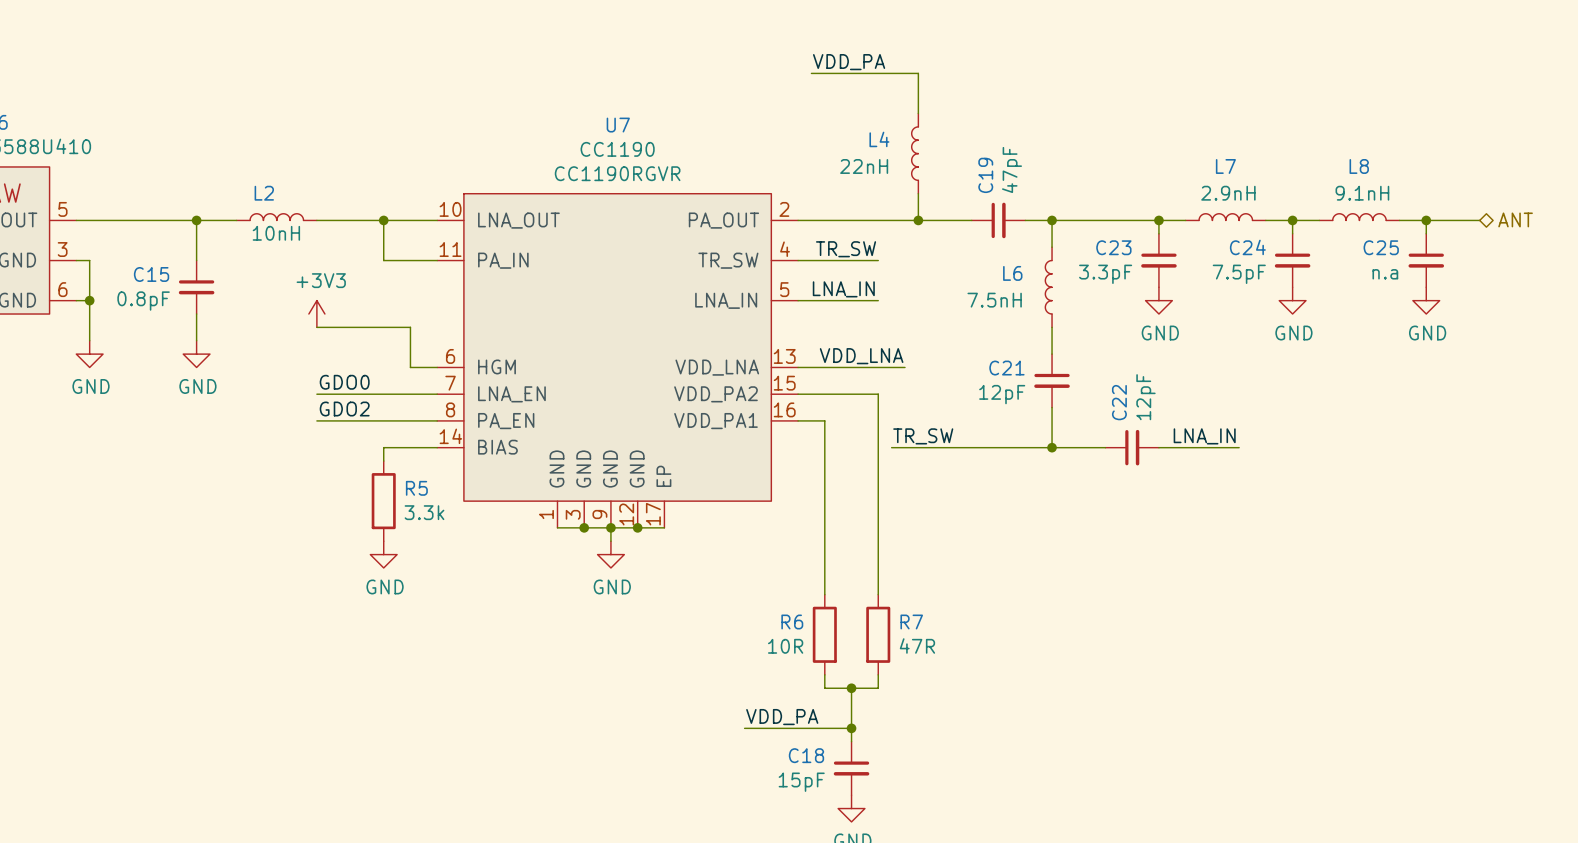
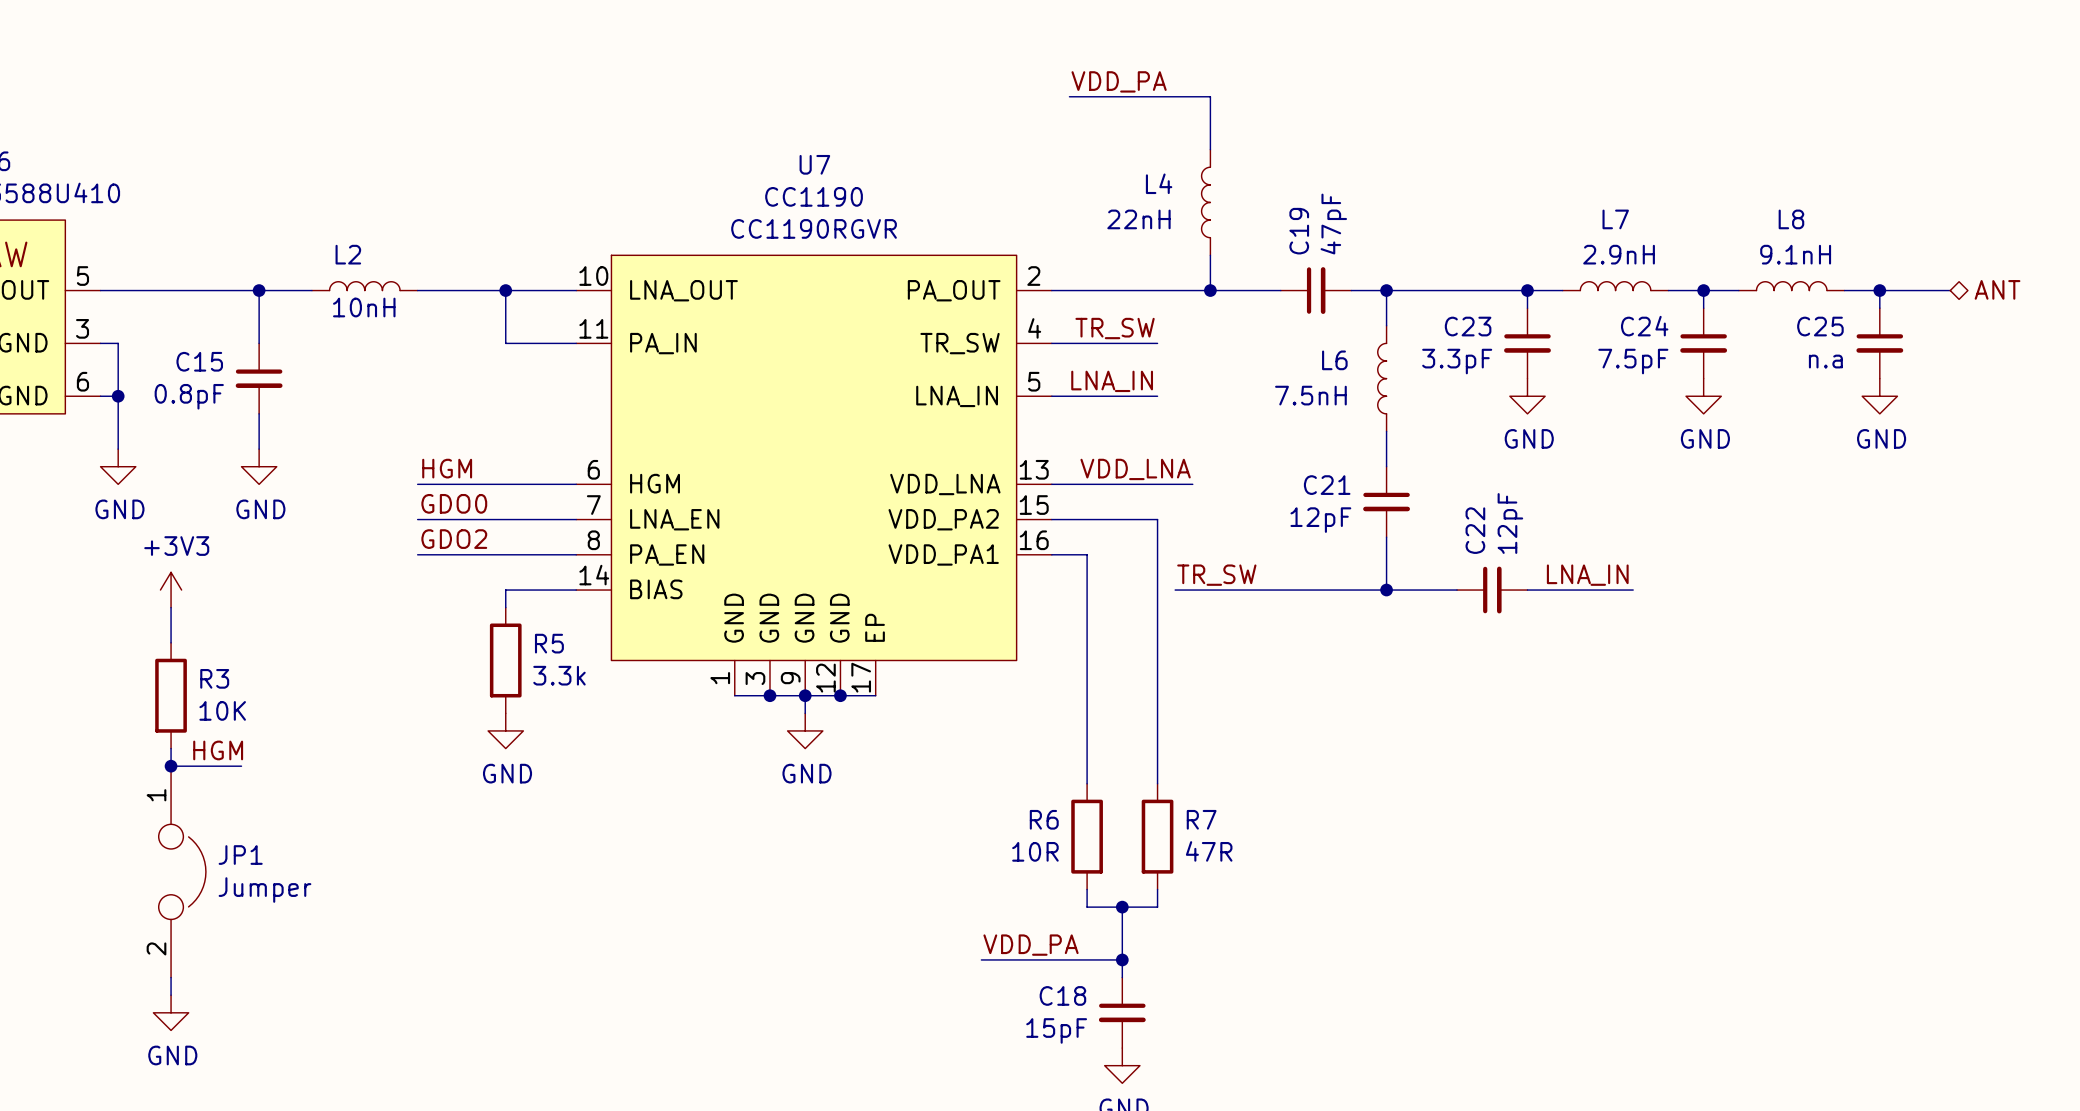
power symbol position: +3V3 (316, 314) -> +3V3 (171, 590)
wire: (316, 327) (410, 327) (410, 367) -> (417, 484) (540, 484)
label: none -> HGM (447, 468)
wire: none -> (171, 607) (171, 642)
R3: none -> 10K (171, 695)
wire: none -> (171, 748) (171, 766) (241, 766)
label: none -> HGM (218, 750)
junction: none -> (171, 766)
JP1: none -> Jumper (182, 871)
wire: none -> (171, 977) (171, 995)
power symbol: none -> GND (171, 1012)

